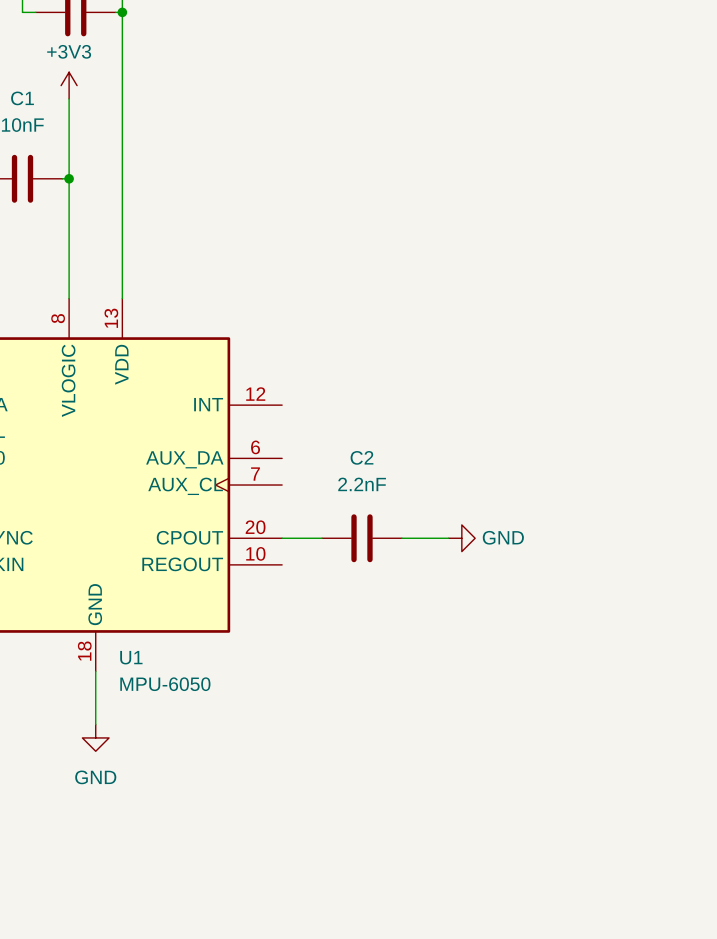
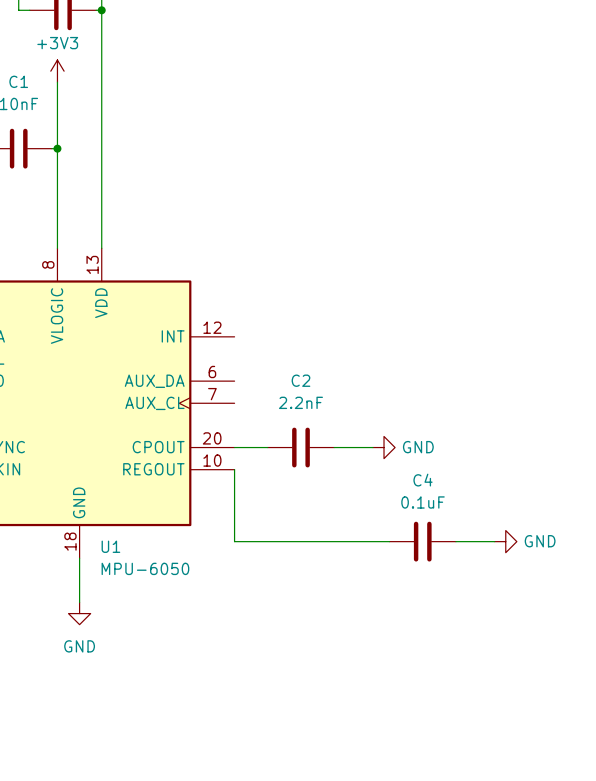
wire: none -> (234, 469) (234, 541) (389, 541)
C4: none -> 0.1uF (422, 541)
wire: none -> (455, 541) (494, 541)
power symbol: none -> GND (505, 541)

